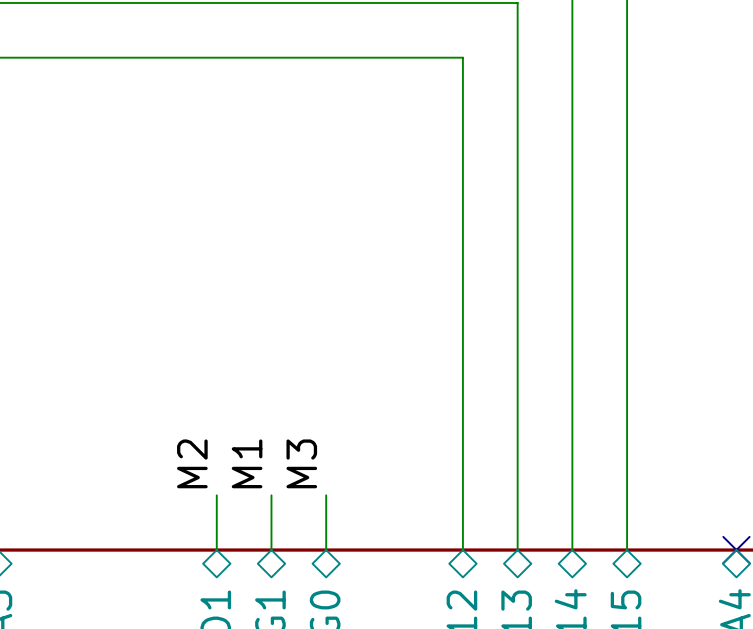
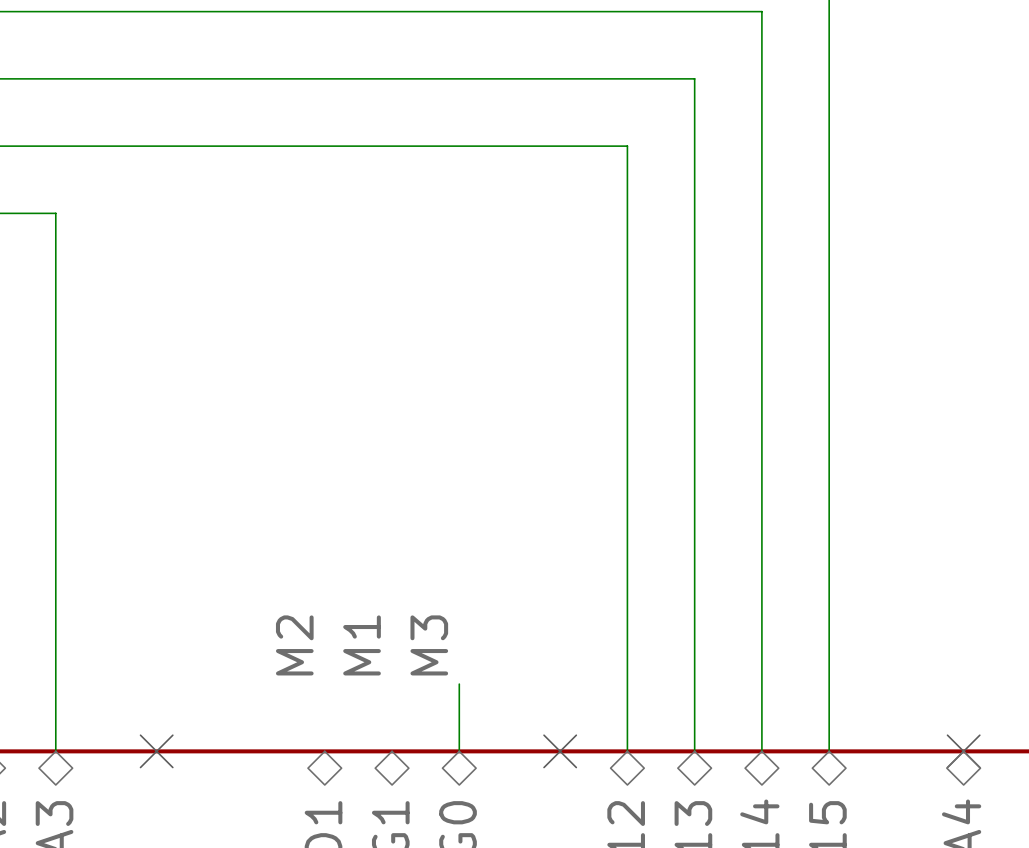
wire: (216, 495) (216, 550) -> none
wire: (271, 495) (271, 550) -> none
no-connect mark: none -> (156, 751)
no-connect mark: none -> (560, 751)

